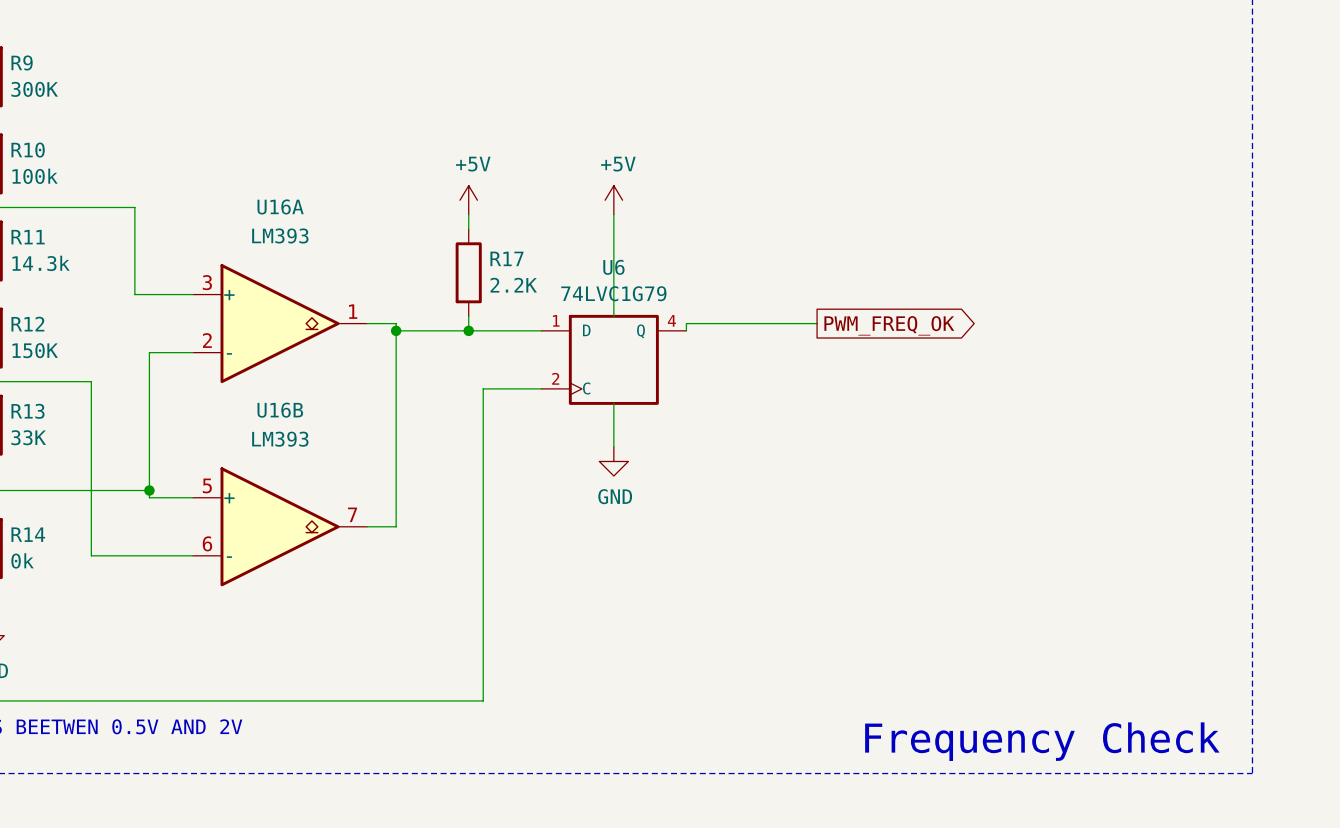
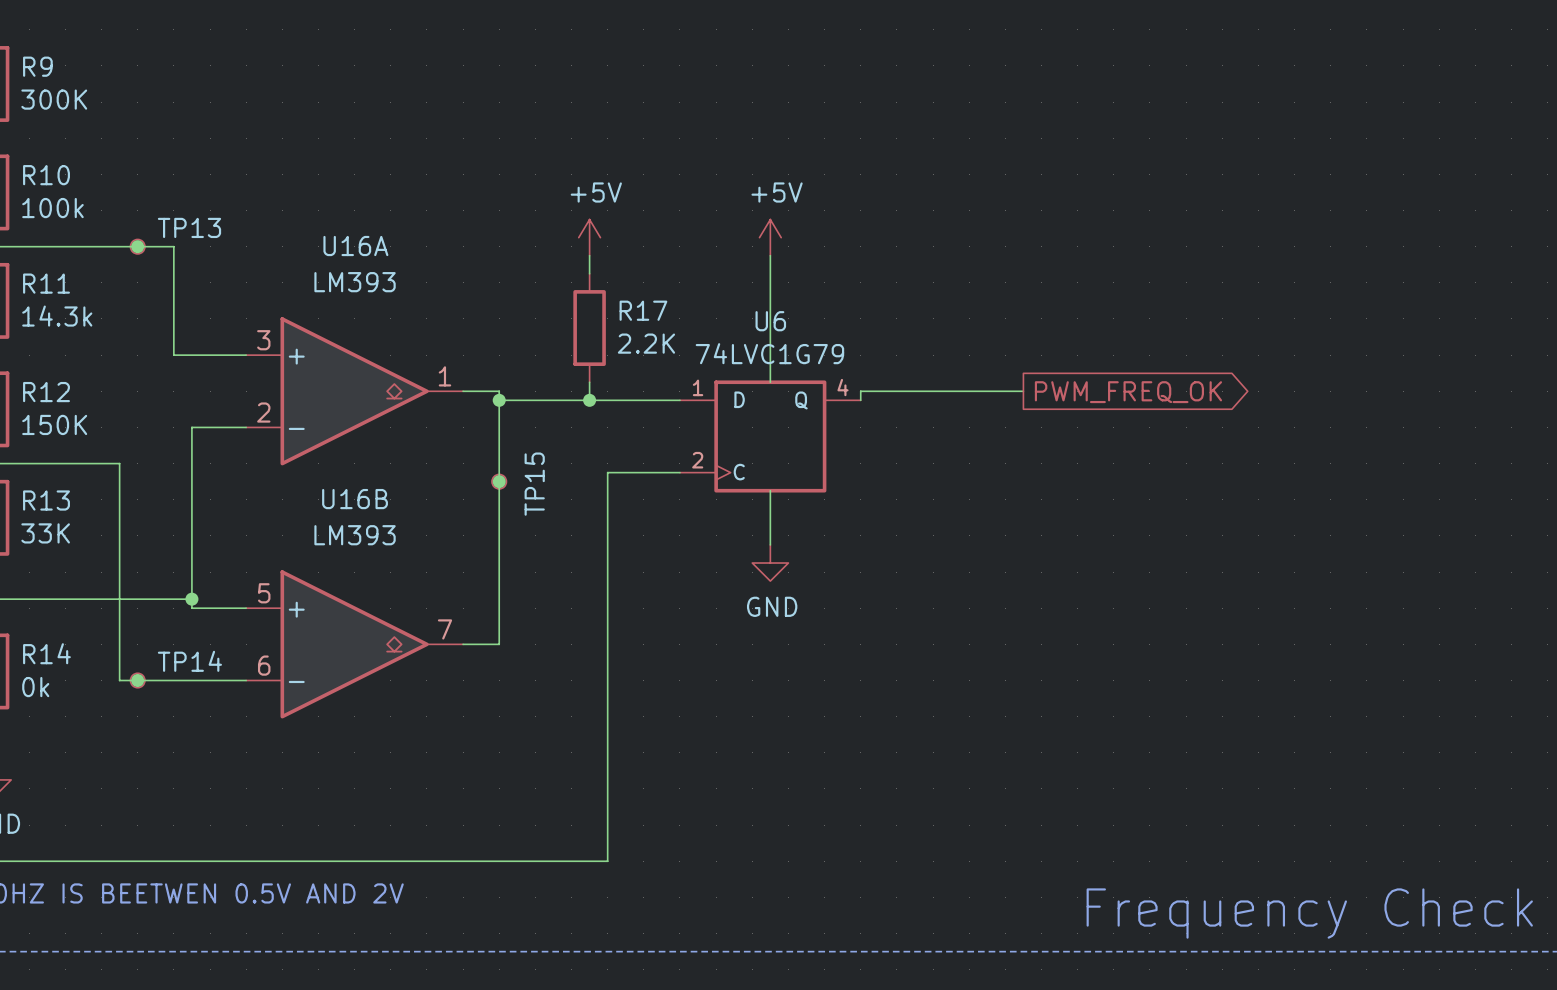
junction: none -> (137, 246)
TP13: none -> (137, 246)
junction: none -> (499, 481)
TP15: none -> (499, 481)
junction: none -> (137, 680)
TP14: none -> (137, 680)

